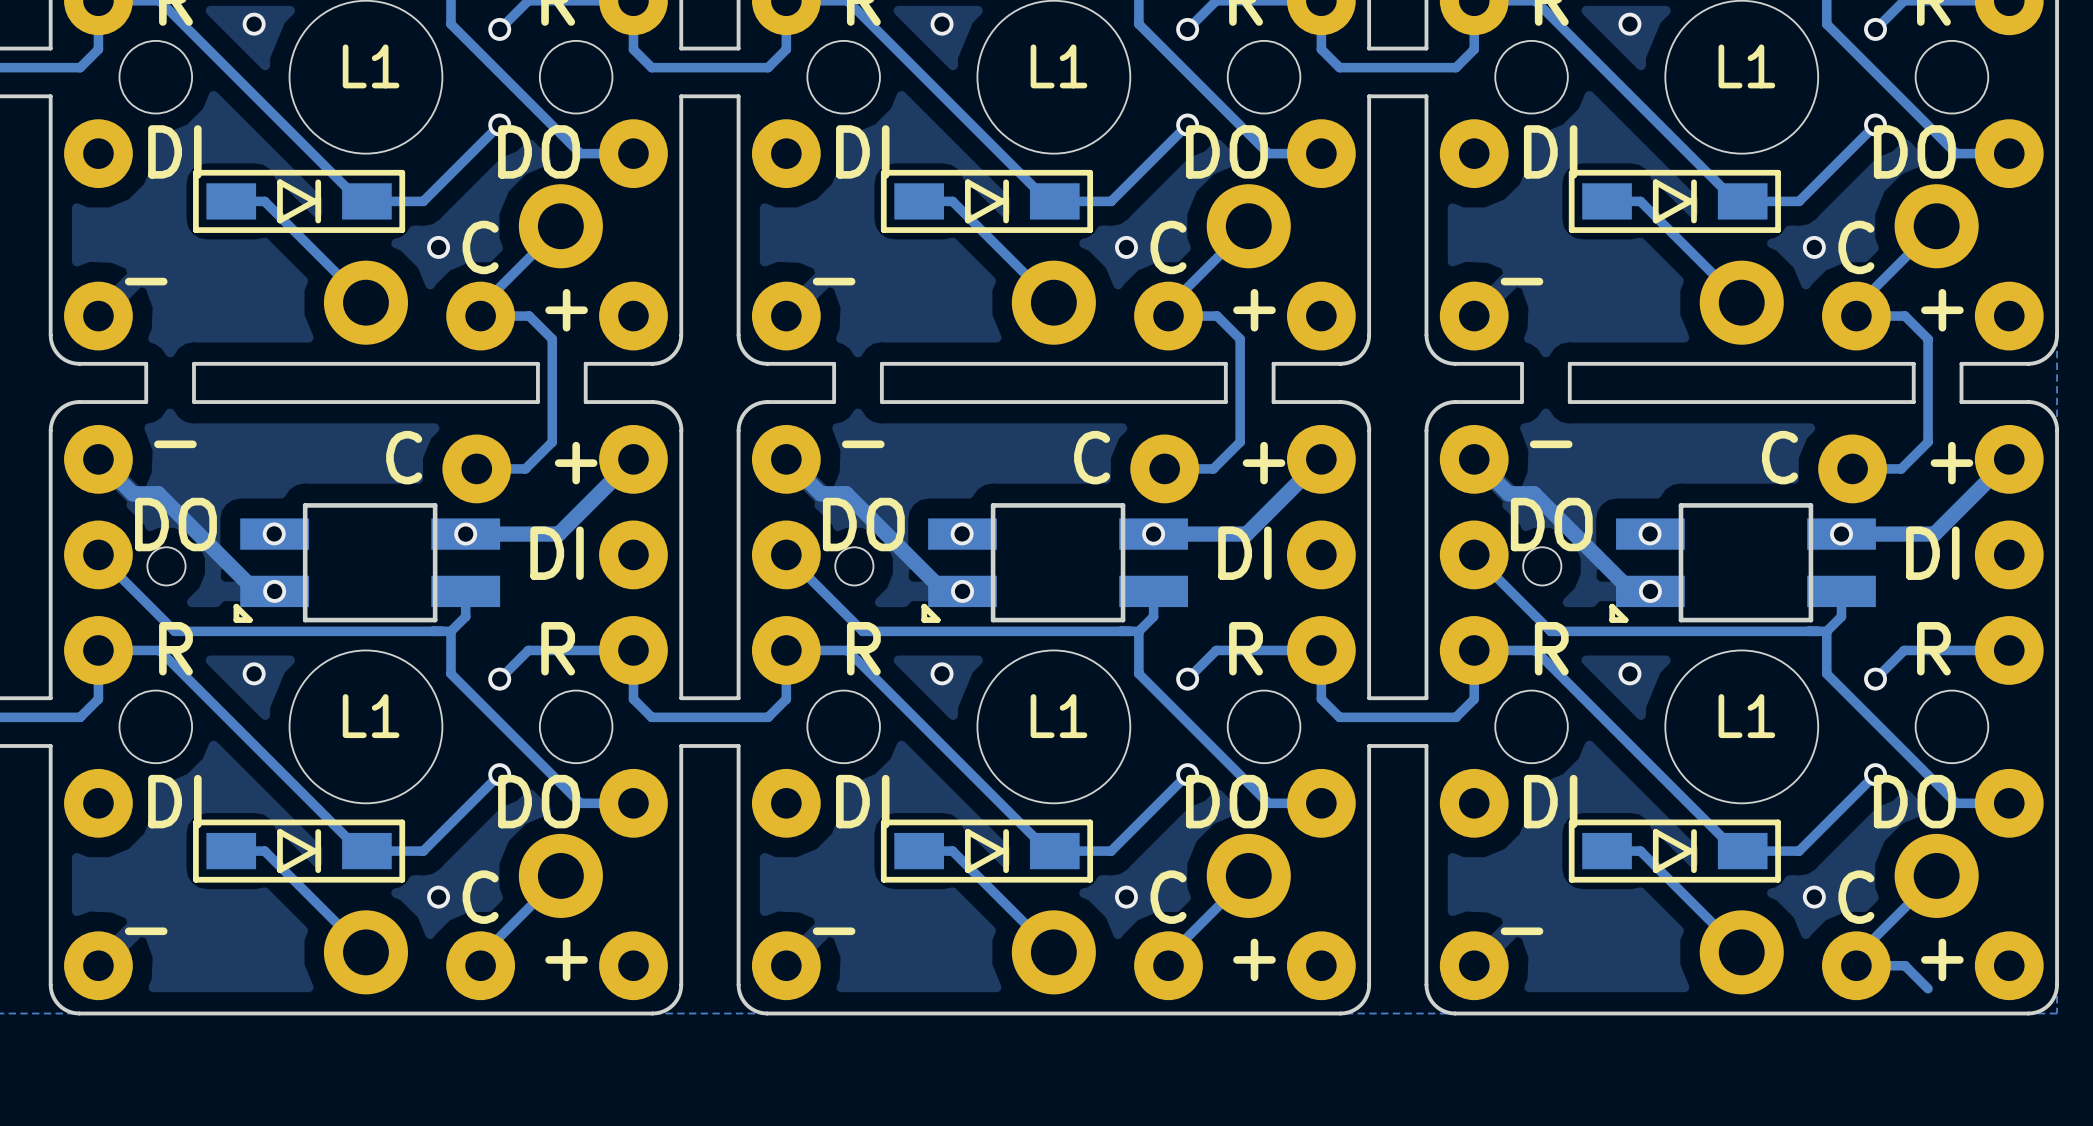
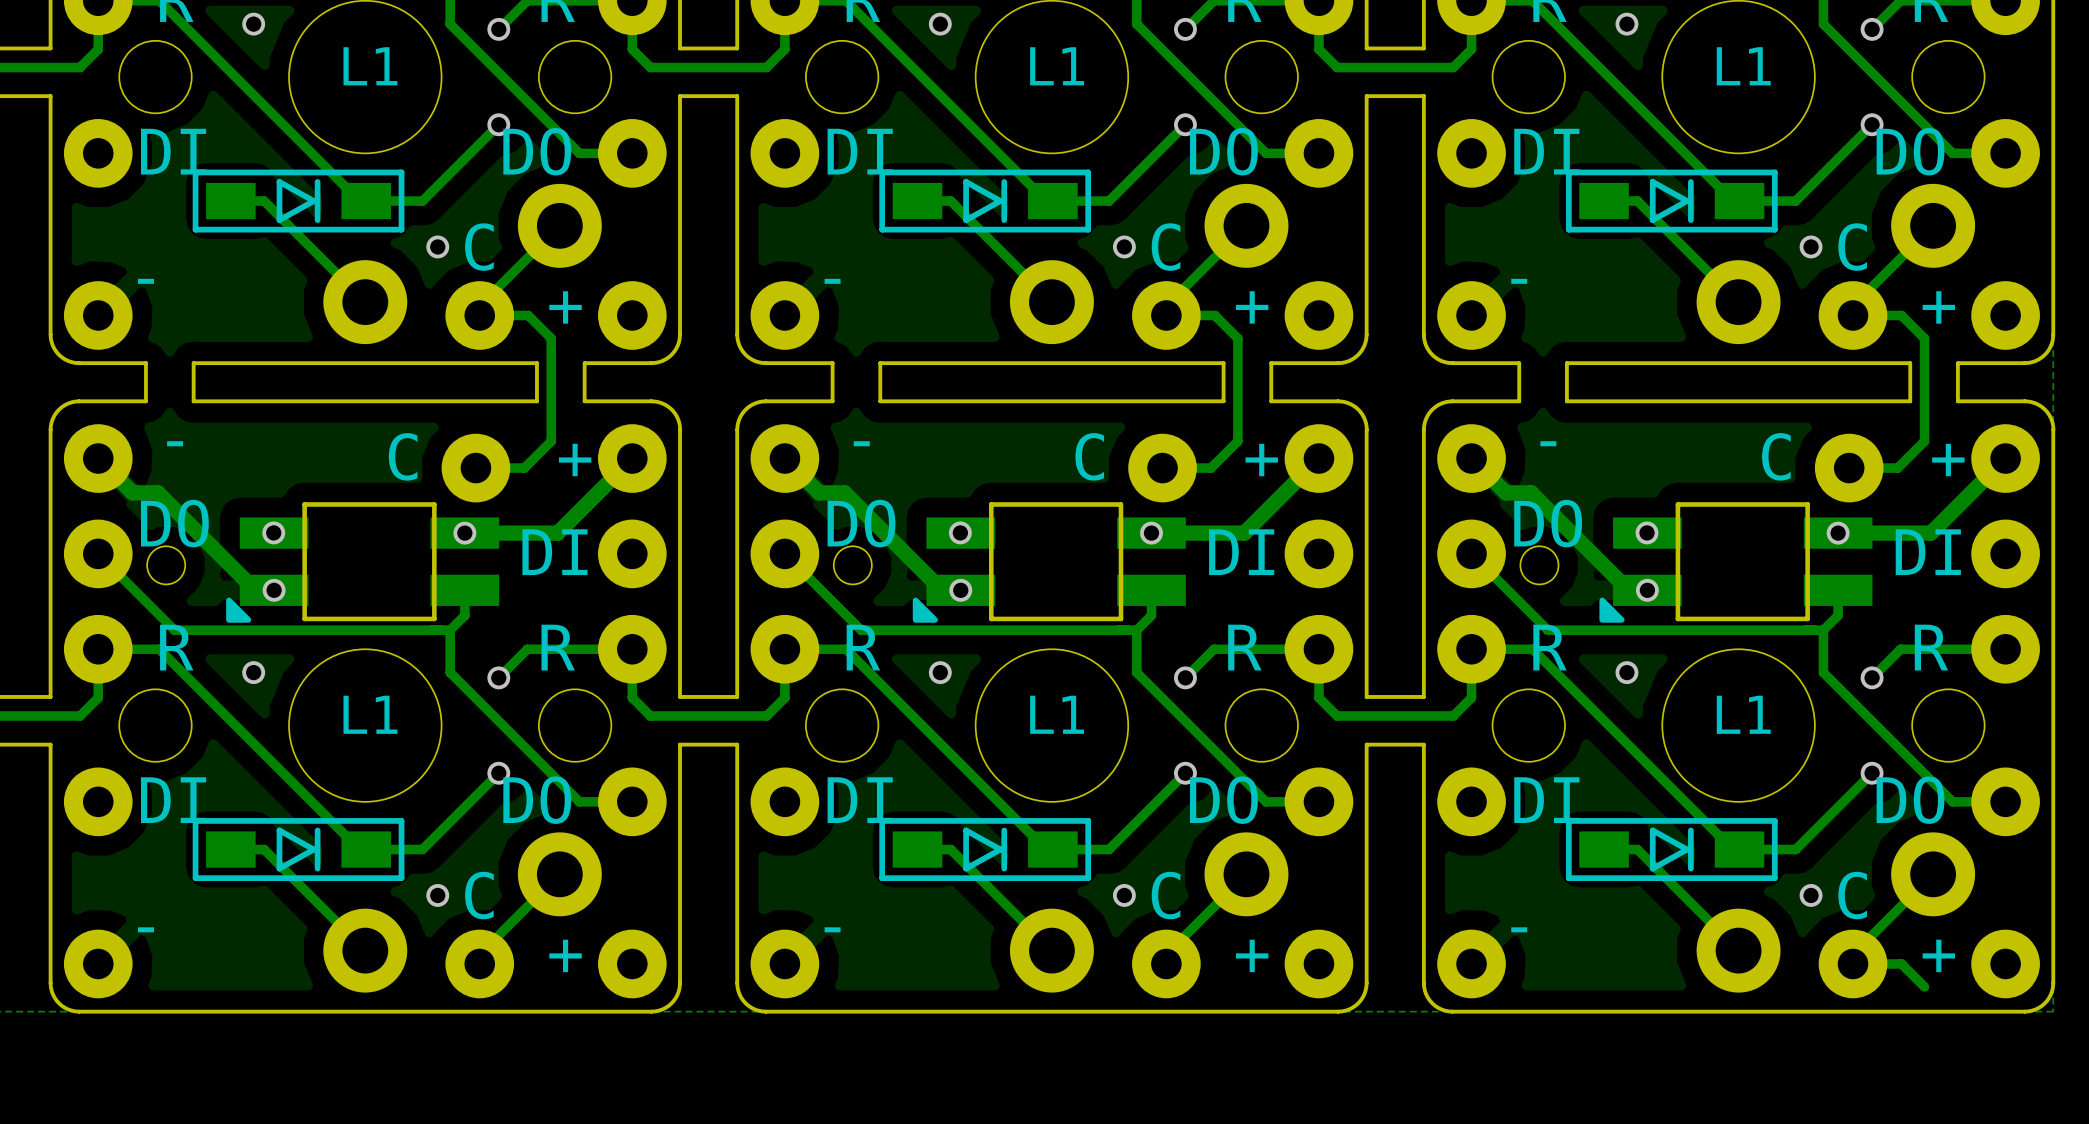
L1 footprint: [233, 503, 501, 623] -> [226, 502, 500, 623]
L1 footprint: [921, 503, 1189, 623] -> [912, 502, 1186, 623]
L1 footprint: [1609, 503, 1876, 623] -> [1599, 502, 1873, 623]

